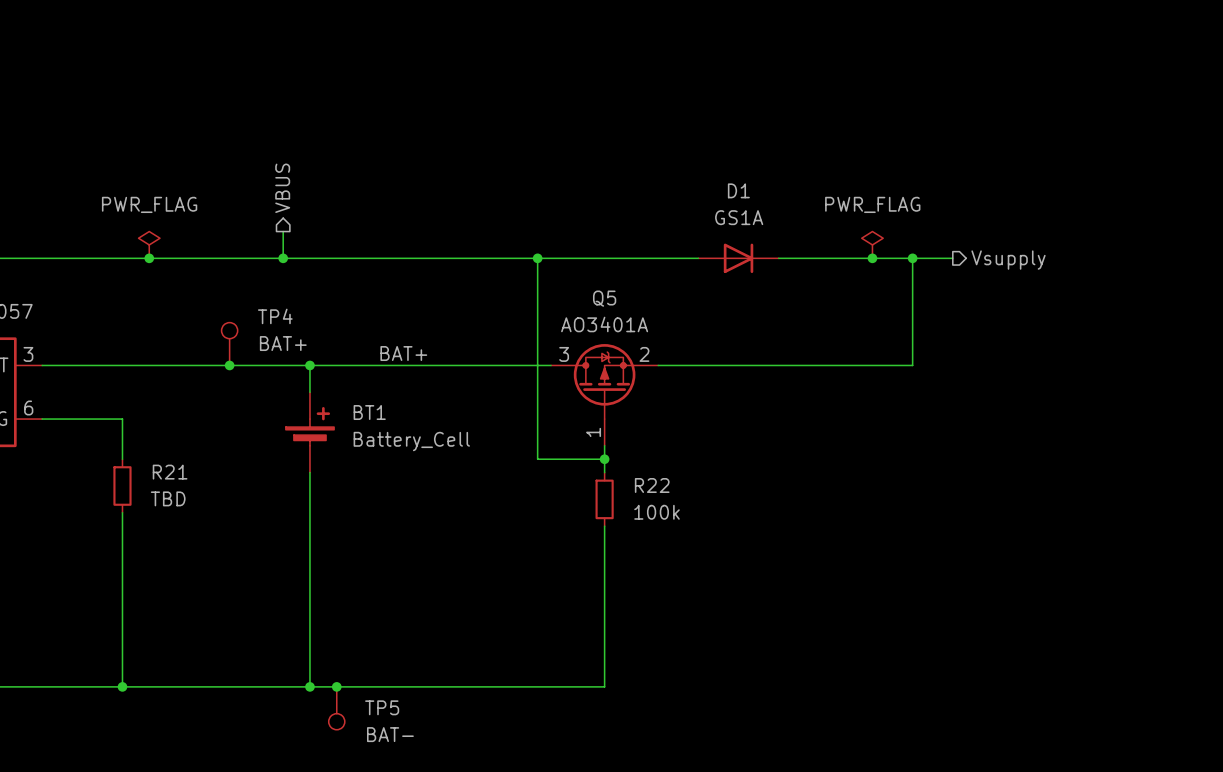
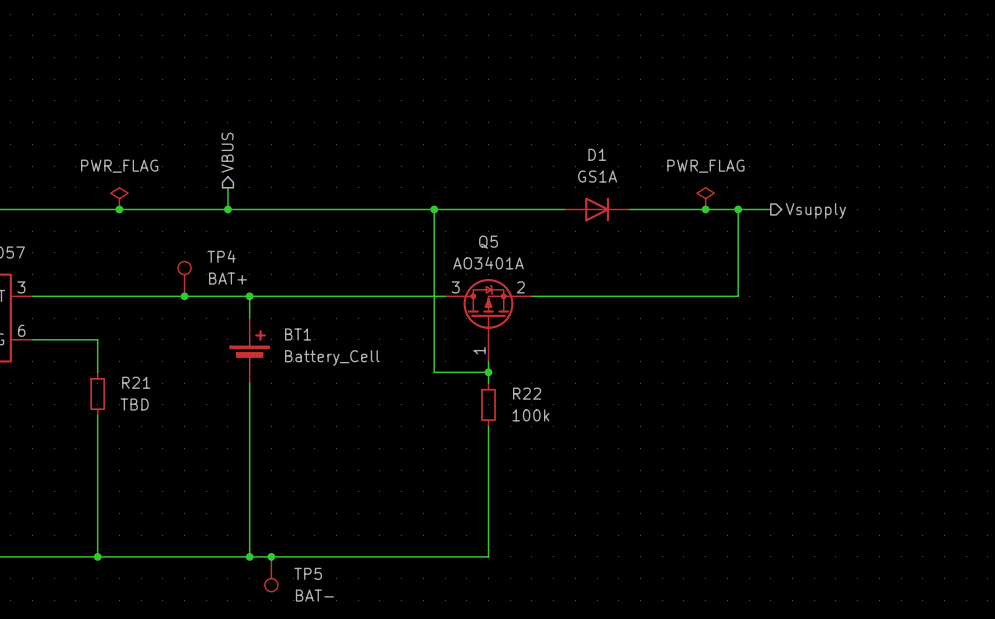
label: BAT+ (403, 353) -> none

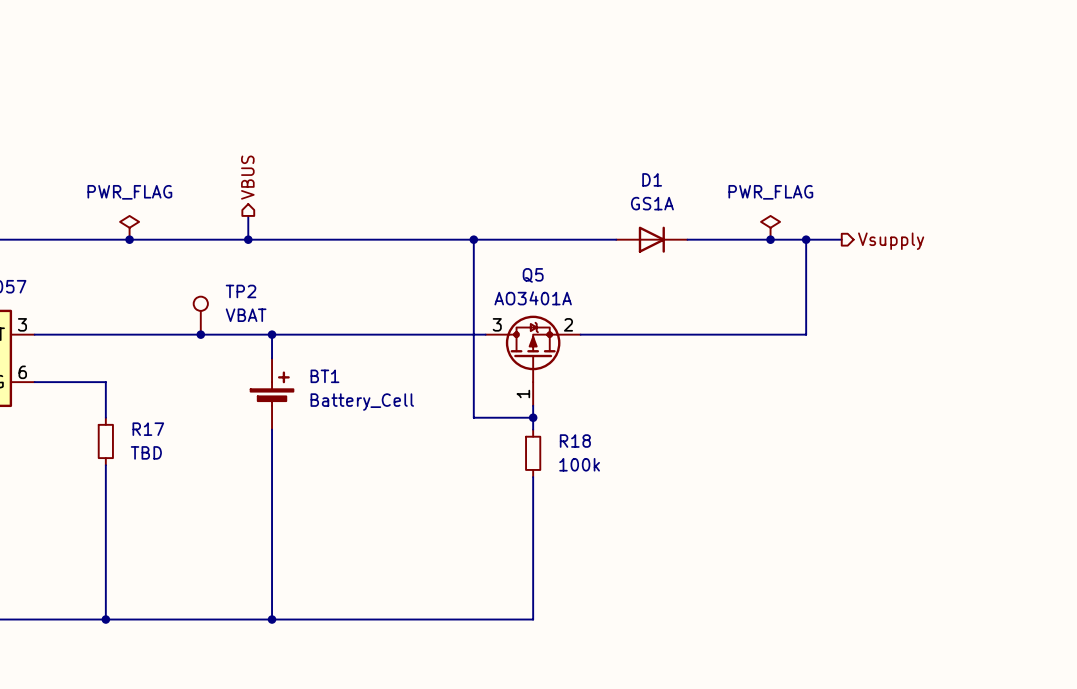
TP4 name: TP4 (221, 256) -> TP2 (241, 291)
TP4 value: BAT+ (228, 278) -> VBAT (246, 315)
R21 name: R21 (136, 382) -> R17 (148, 429)
R22 name: R22 (527, 393) -> R18 (575, 441)
junction: (271, 556) -> none
TP5: BAT- (271, 574) -> none

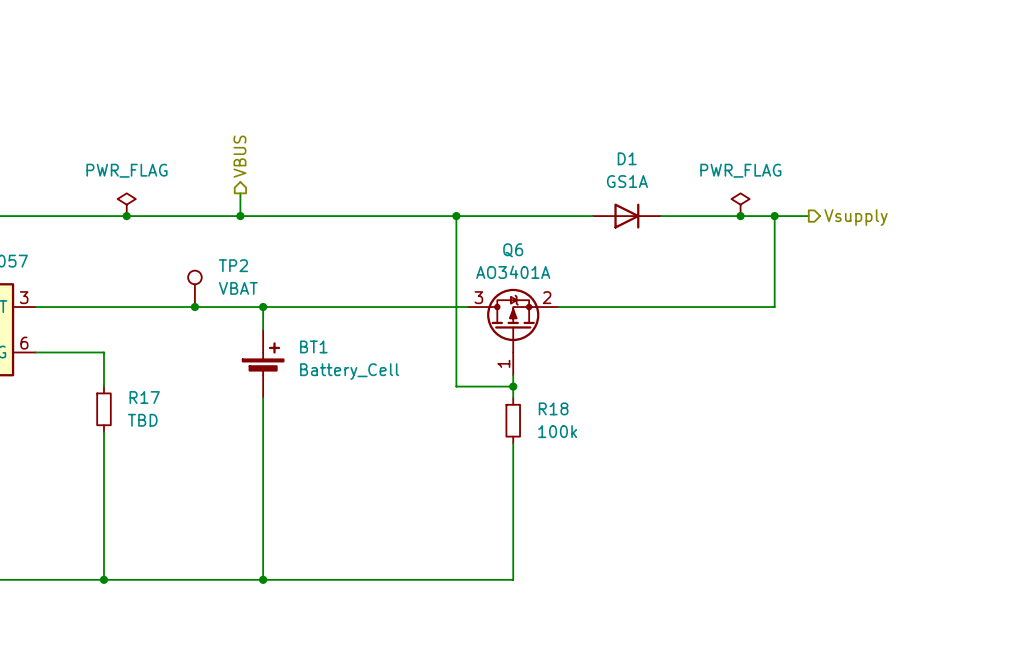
Q5 name: Q5 (533, 275) -> Q6 (513, 250)

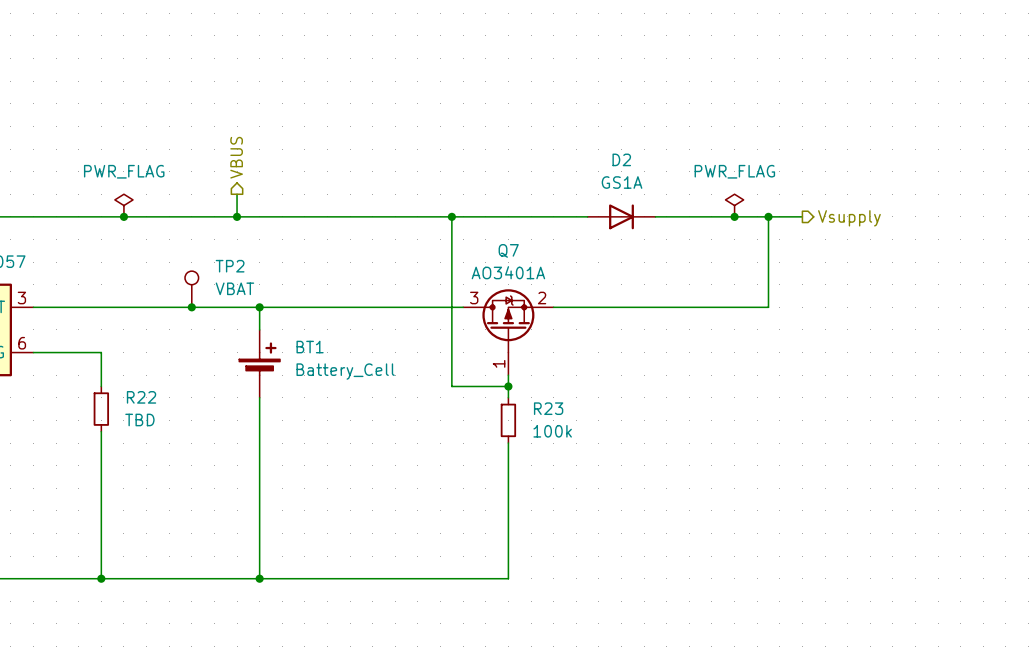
D1 name: D1 (627, 158) -> D2 (621, 159)
Q6 name: Q6 (513, 250) -> Q7 (508, 250)
R17 name: R17 (144, 397) -> R22 (141, 397)
R18 name: R18 (553, 408) -> R23 (548, 408)

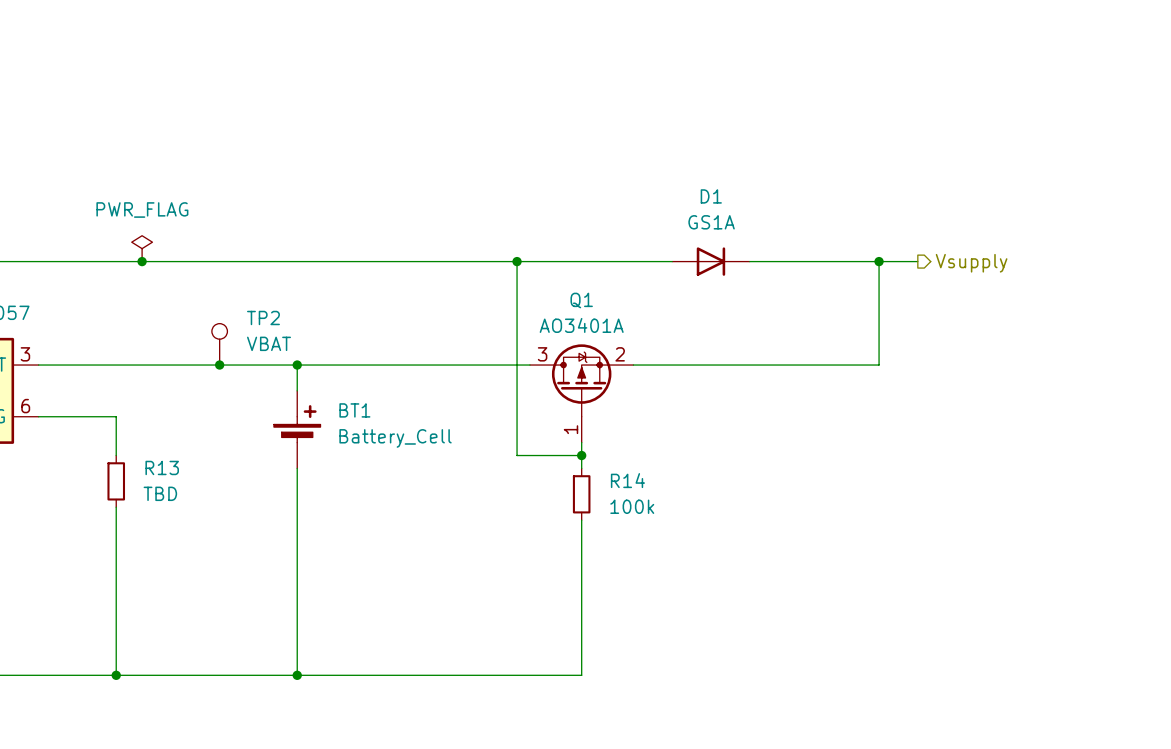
hierarchical label: VBUS (236, 157) -> none
D2 name: D2 (621, 159) -> D1 (711, 196)
wire: (237, 194) (237, 216) -> none
power symbol: PWR_FLAG (734, 205) -> none
junction: (237, 216) -> none
junction: (734, 216) -> none
Q7 name: Q7 (508, 250) -> Q1 (581, 300)
R22 name: R22 (141, 397) -> R13 (162, 467)
R23 name: R23 (548, 408) -> R14 (627, 480)

